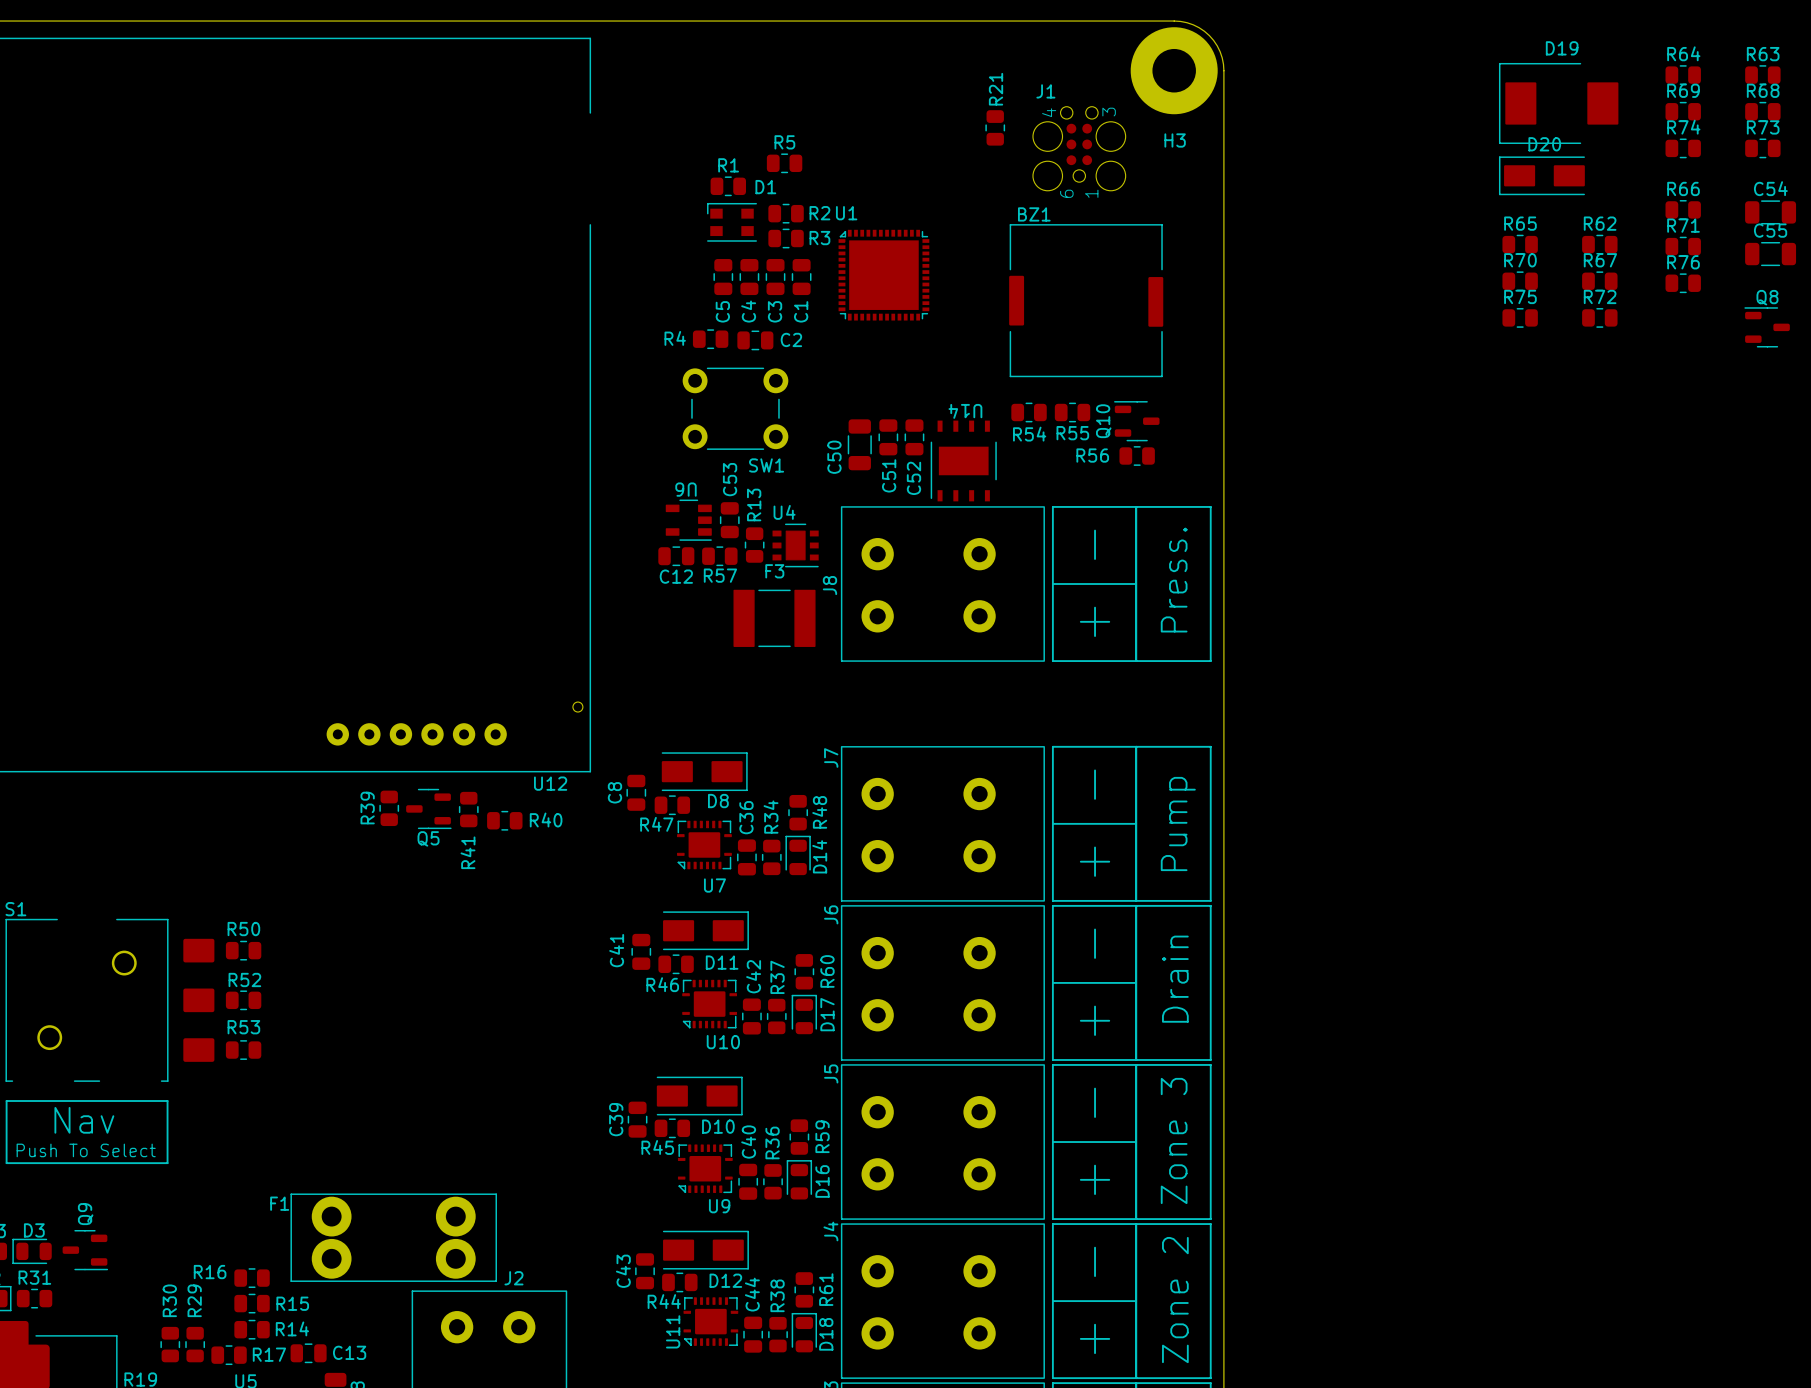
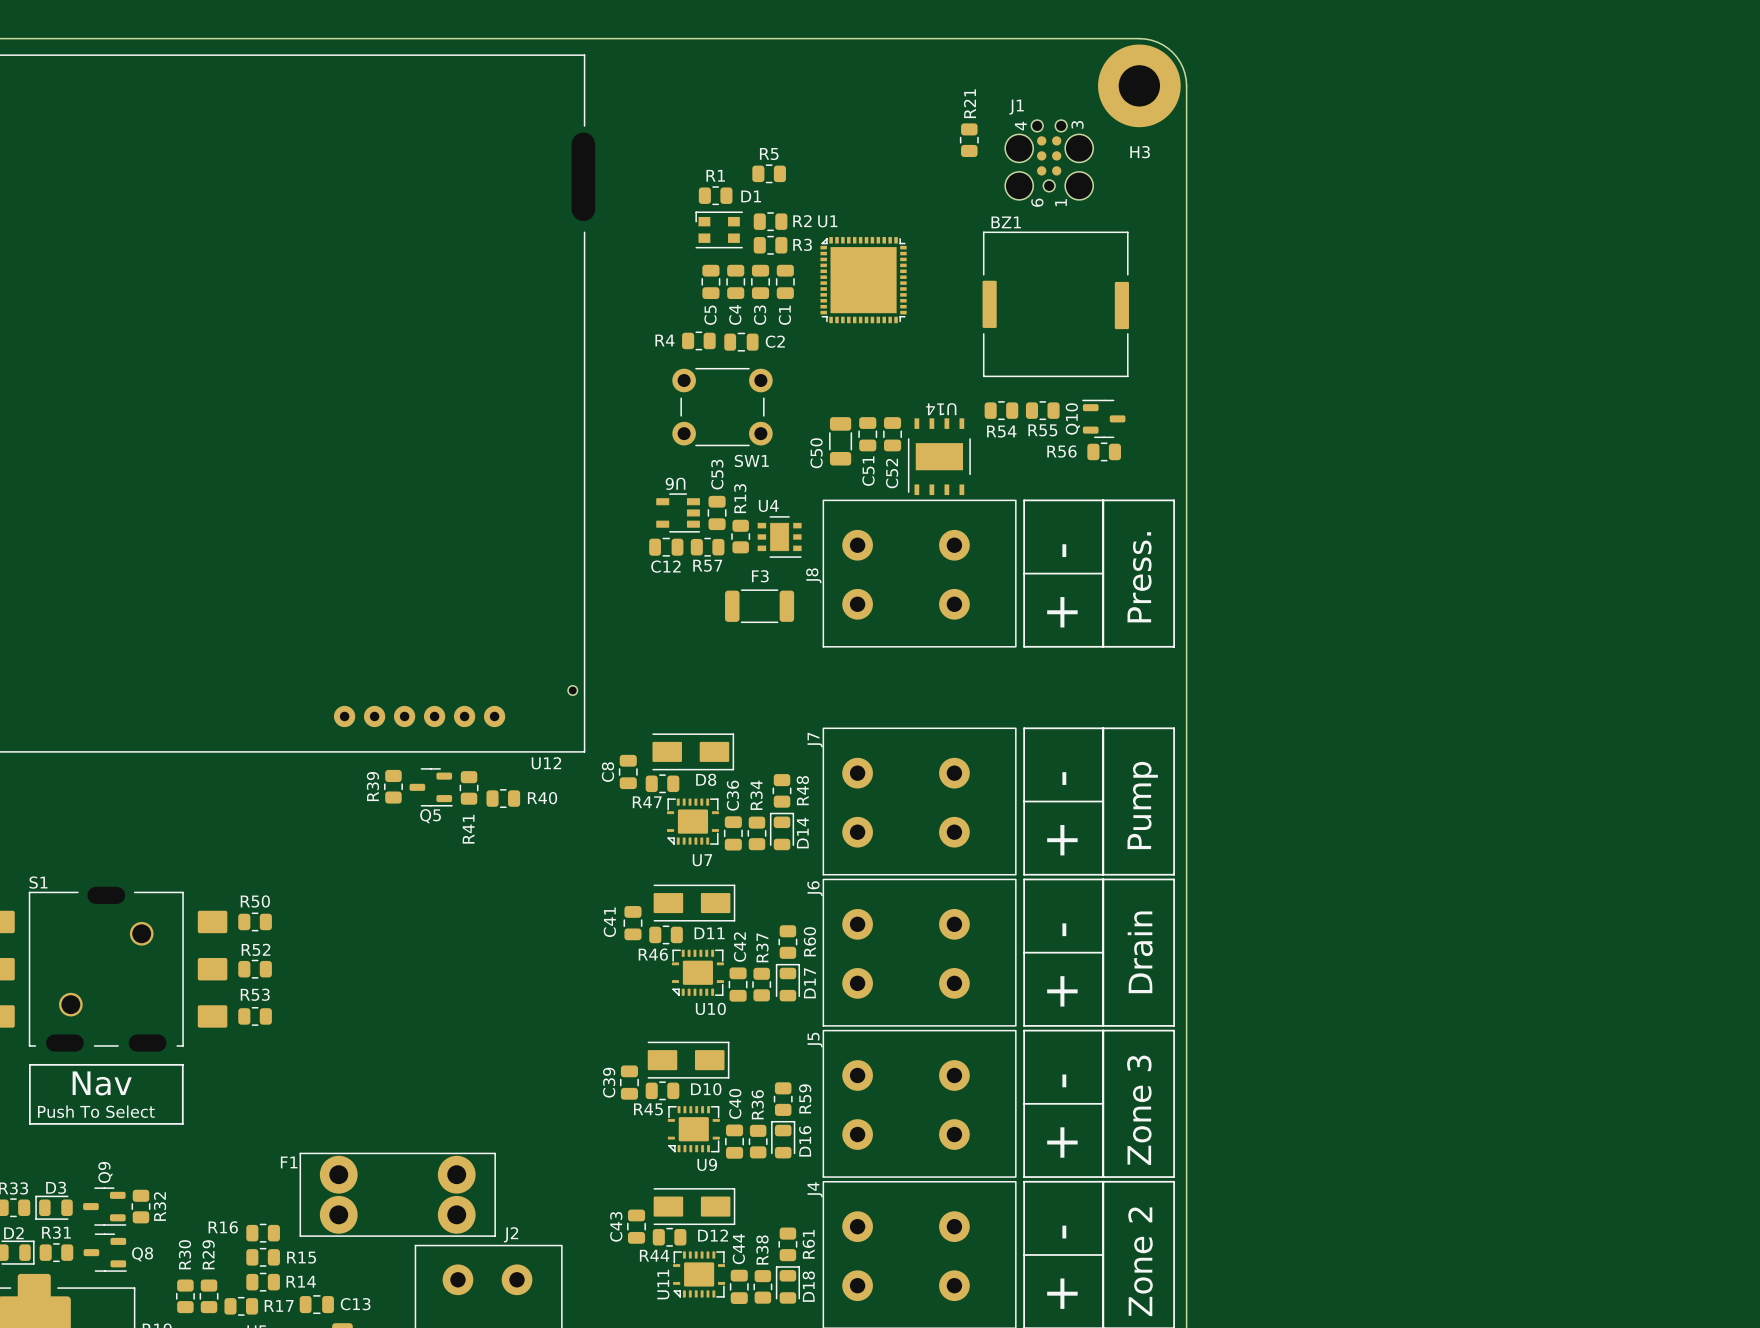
R64: (1683, 75) -> none
R63: (1762, 75) -> none
D19: (1558, 103) -> none
R69: (1683, 111) -> none
R68: (1762, 111) -> none
R74: (1683, 148) -> none
R73: (1762, 148) -> none
D20: (1541, 175) -> none
R66: (1683, 209) -> none
C54: (1770, 212) -> none
R65: (1520, 244) -> none
R62: (1599, 244) -> none
R71: (1683, 246) -> none
C55: (1770, 254) -> none
R70: (1520, 281) -> none
R67: (1599, 281) -> none
R76: (1683, 283) -> none
Q8 name position: Q8 (1767, 297) -> Q8 (142, 1254)
R75: (1520, 317) -> none
R72: (1599, 317) -> none
Q8 rotation: 0° (1767, 327) -> 180° (105, 1252)
Q8 position: (1767, 327) -> (105, 1252)
F3 footprint: [733, 589, 816, 648] -> [725, 589, 795, 624]
R32: none -> (140, 1206)

